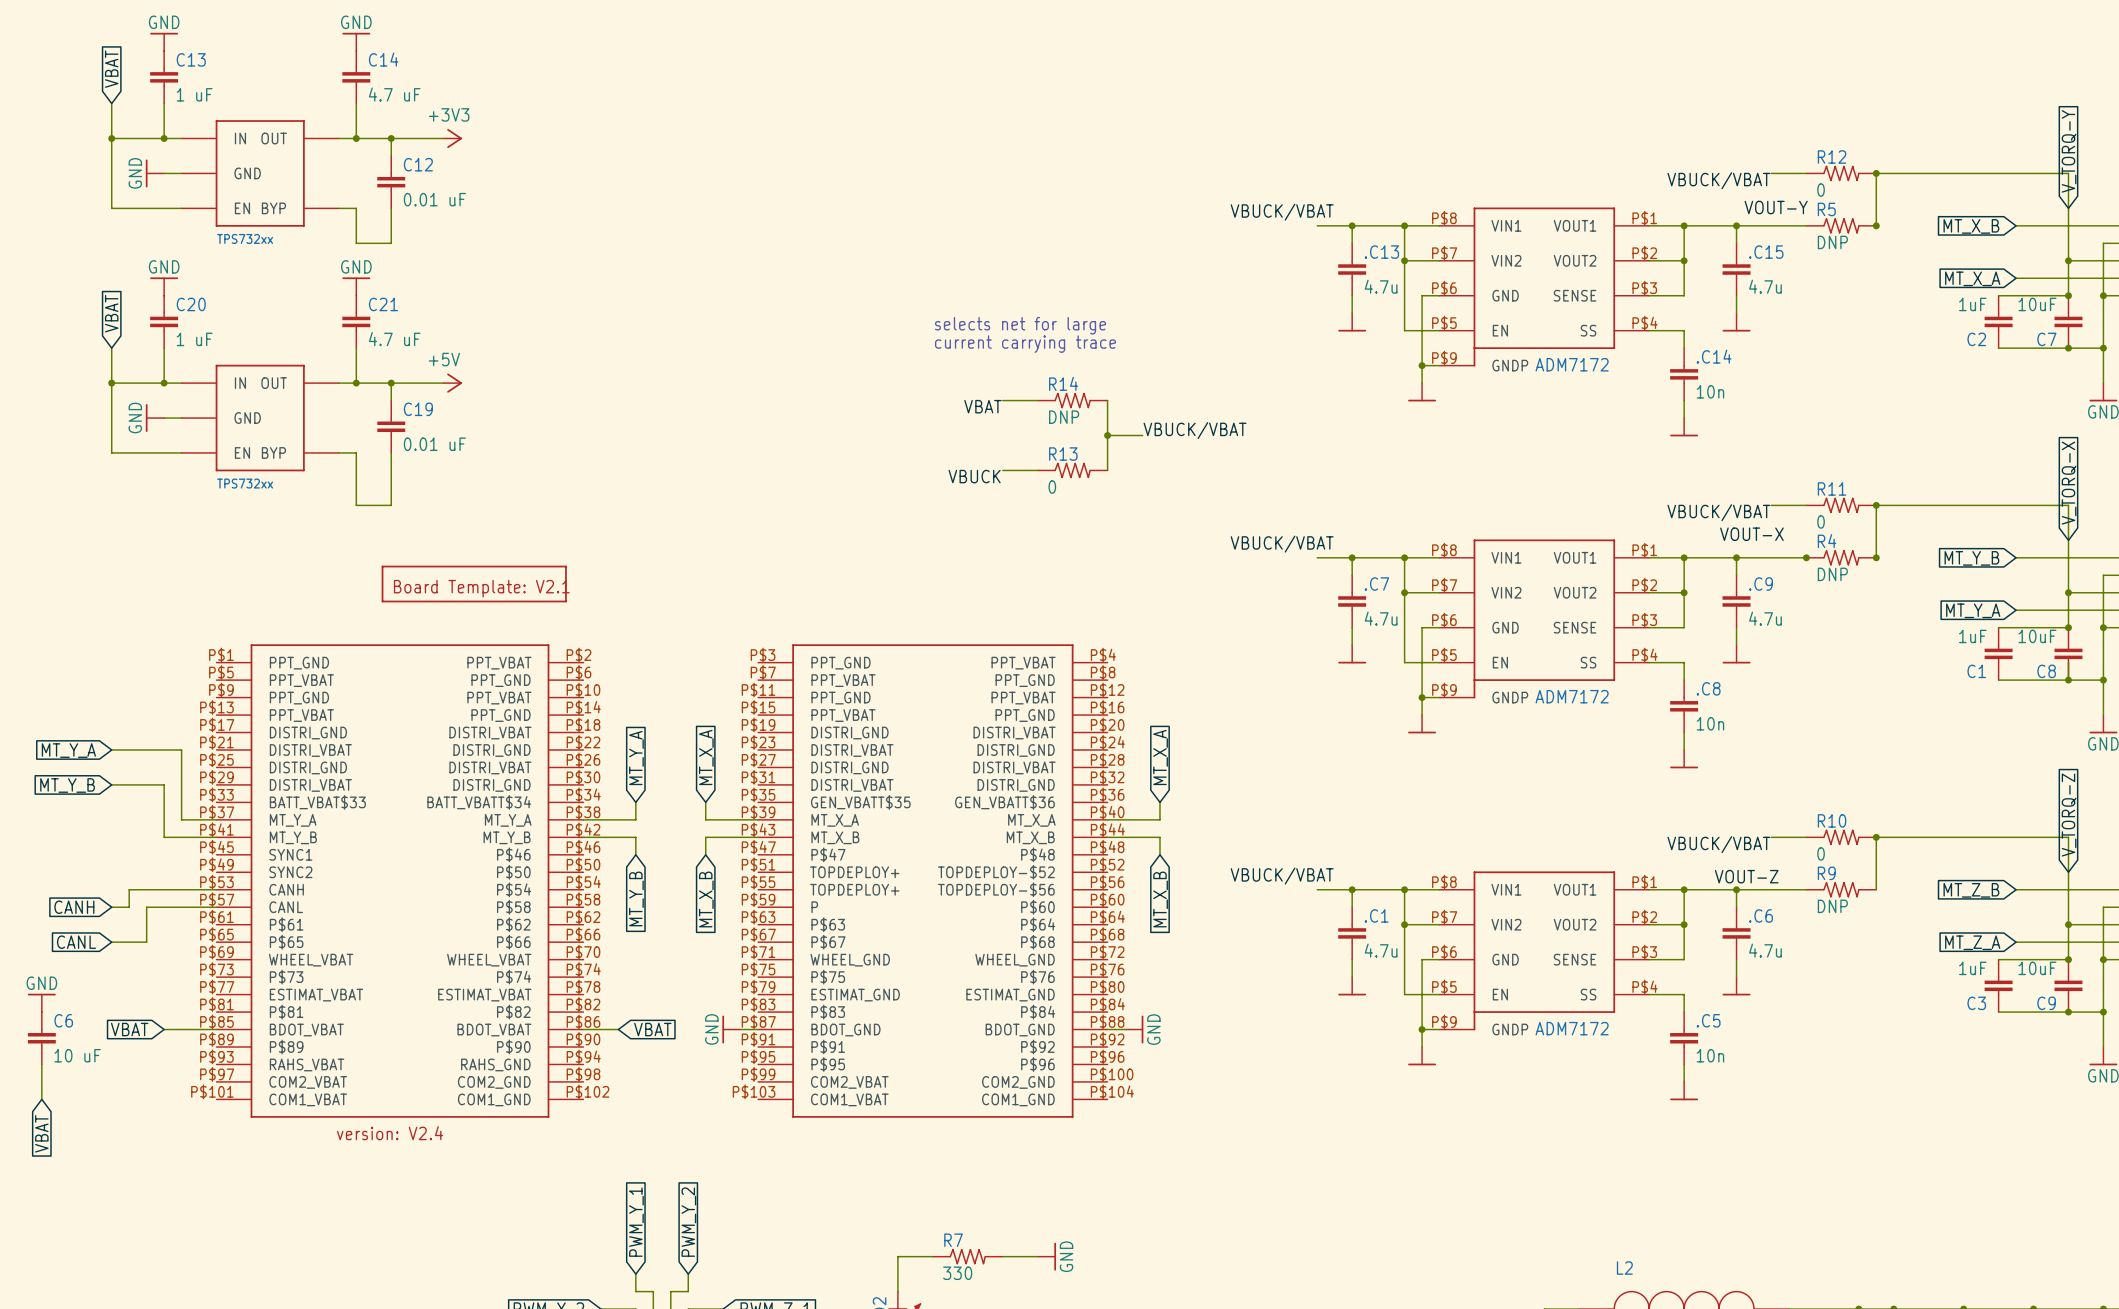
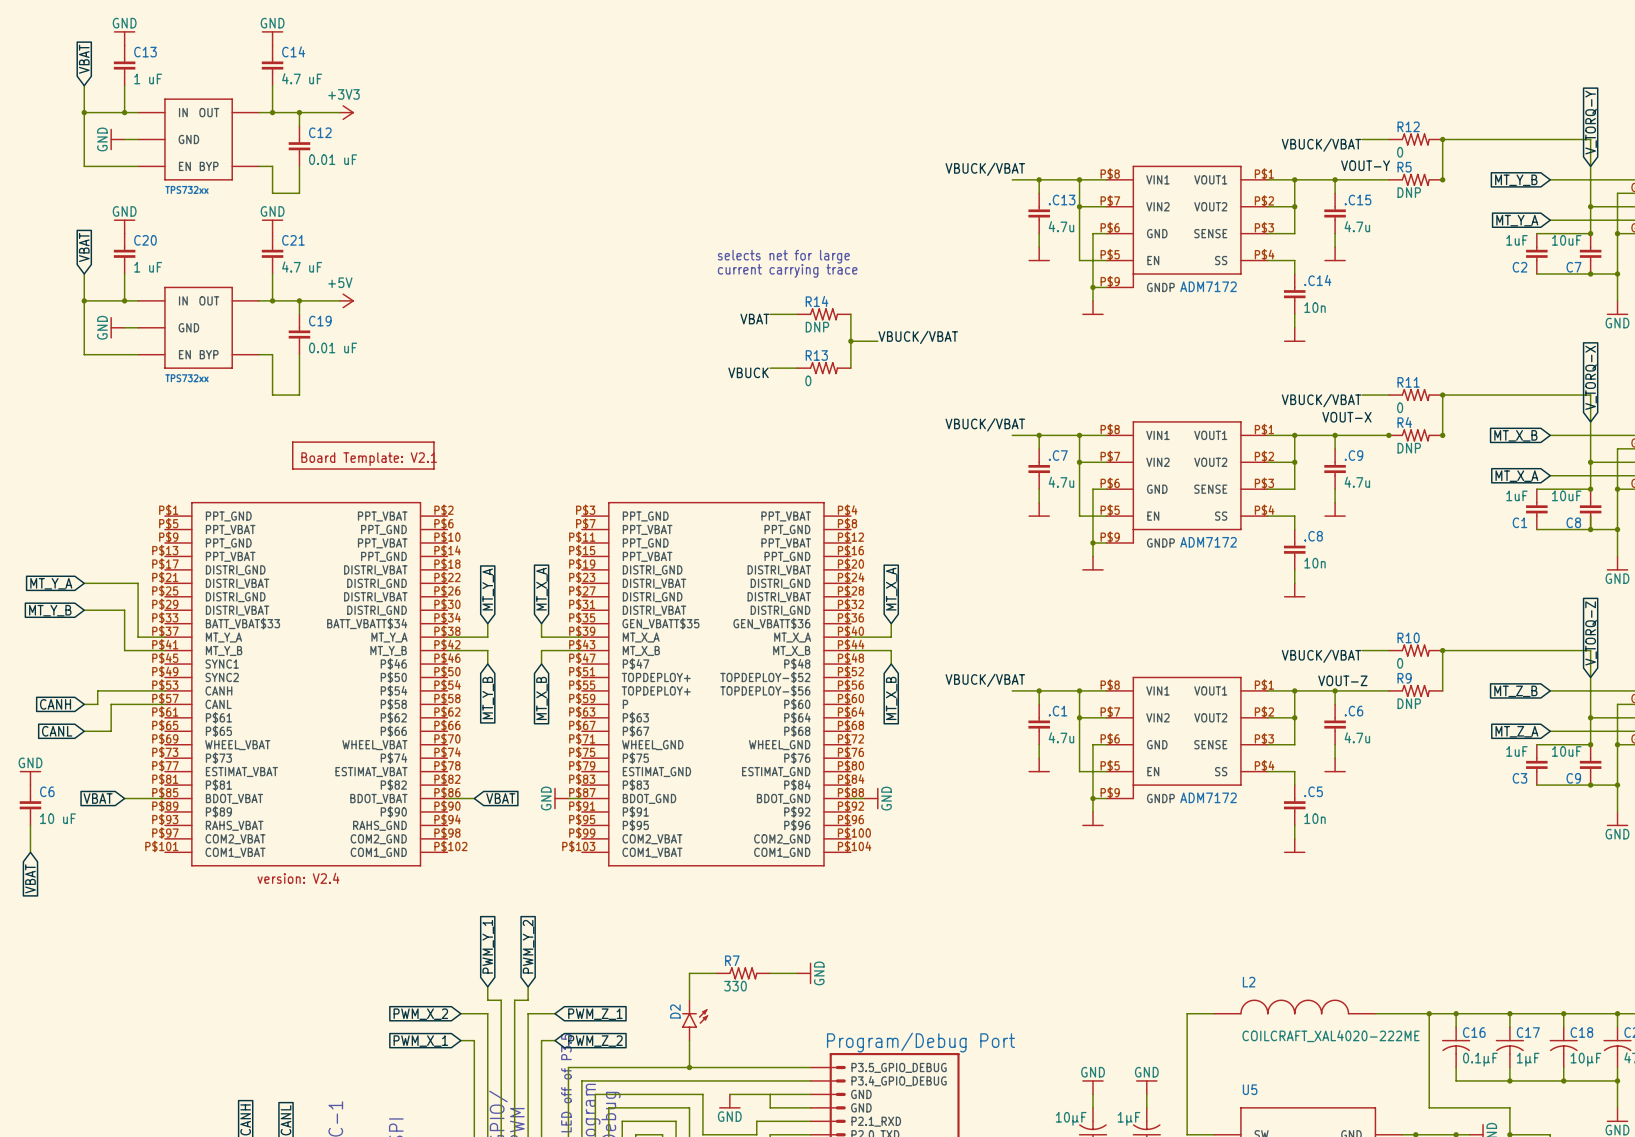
global label: MT_X_B (1971, 226) -> MT_Y_B (1516, 180)
global label: MT_X_A (1972, 278) -> MT_Y_A (1517, 220)
global label: MT_Y_B (1971, 558) -> MT_X_B (1515, 435)
global label: MT_Y_A (1973, 610) -> MT_X_A (1516, 476)

